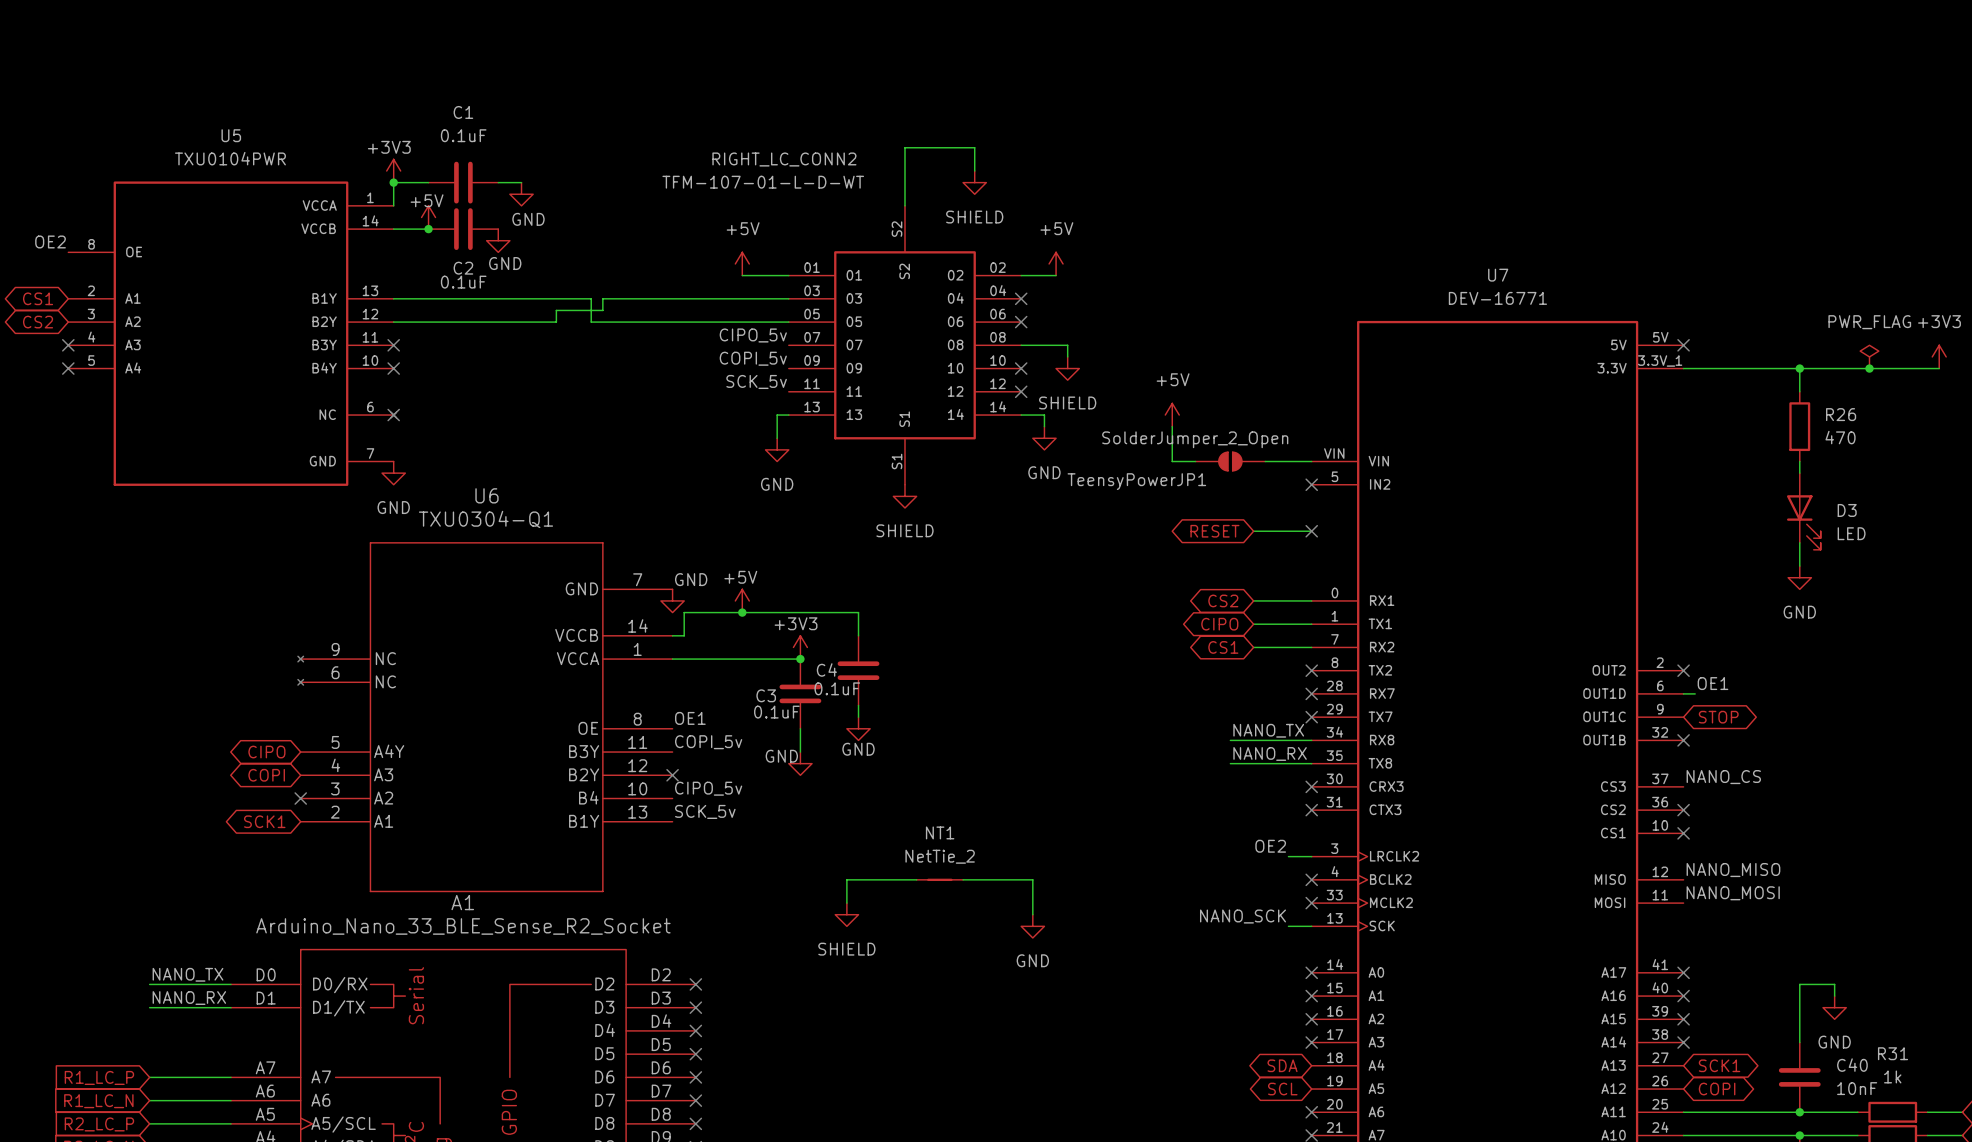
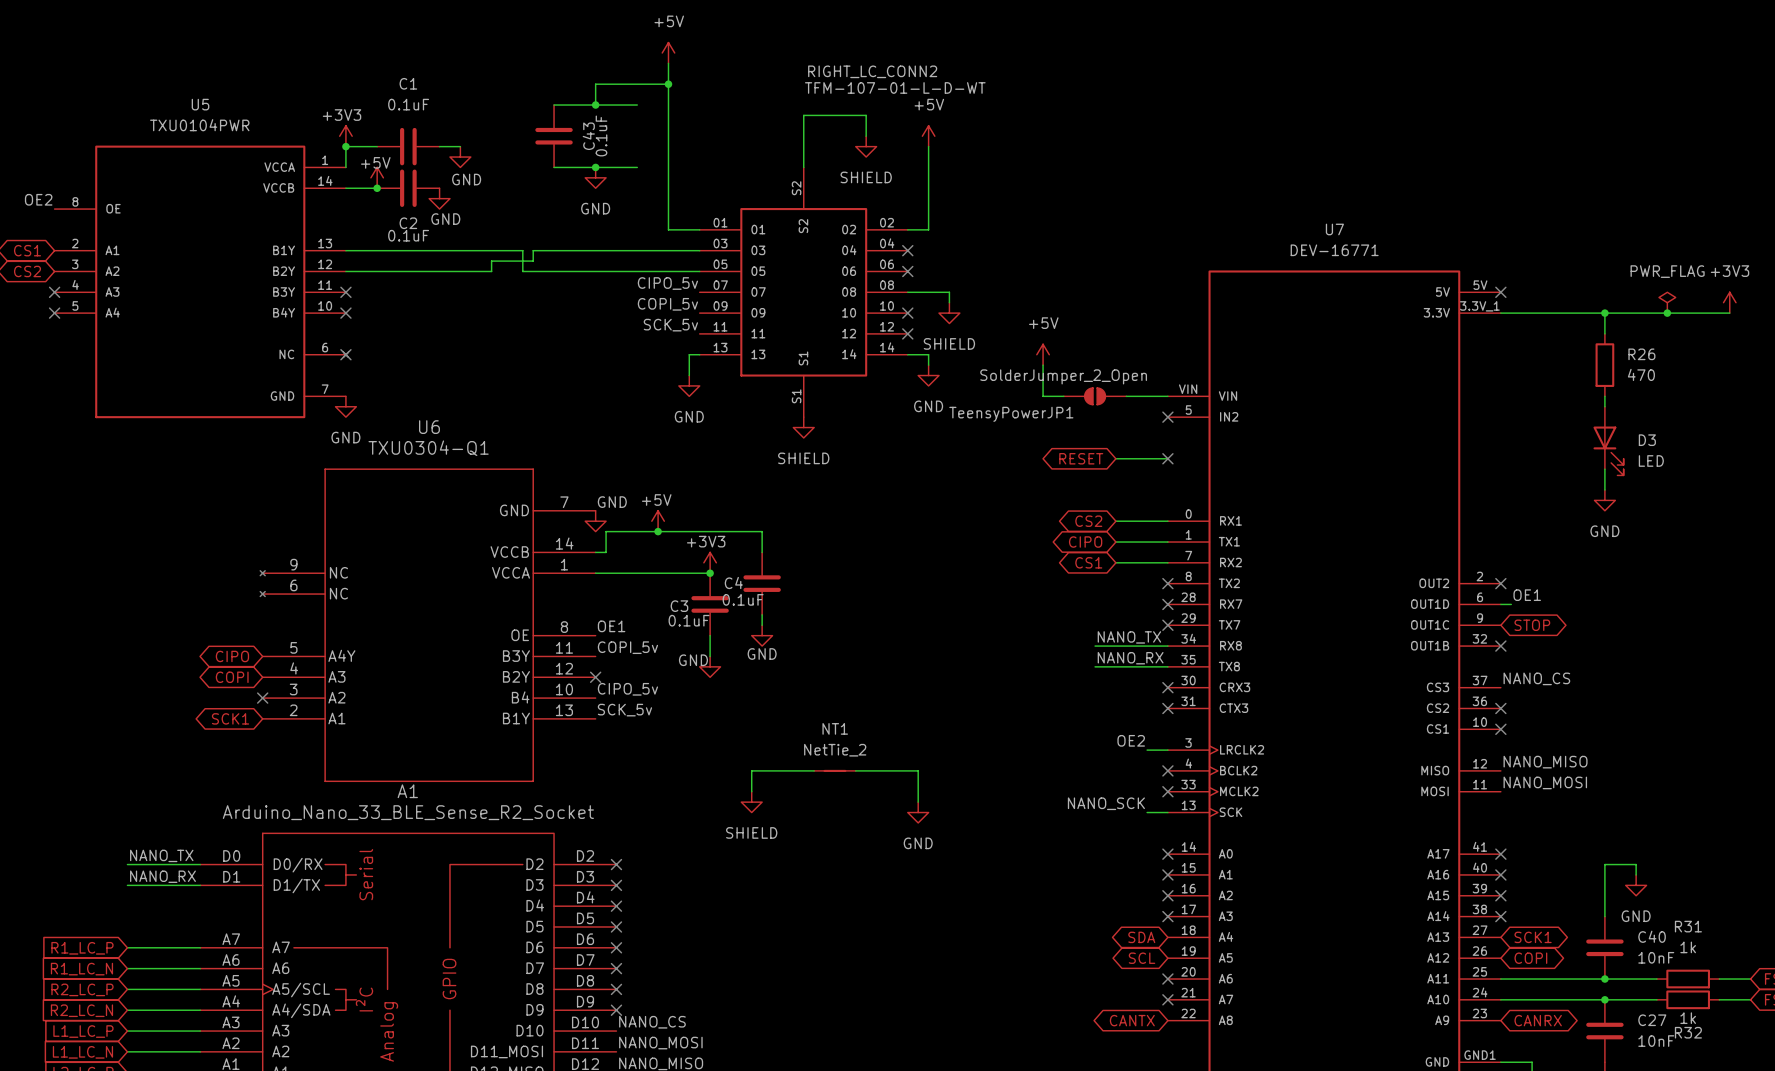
power symbol: none -> +5V (668, 52)
wire: none -> (668, 84) (595, 84) (595, 105)
junction: none -> (668, 84)
wire: none -> (554, 105) (637, 105)
junction: none -> (595, 105)
RIGHT_LC_CONN2 name position: RIGHT_LC_CONN2 (784, 159) -> RIGHT_LC_CONN2 (872, 71)
C43: none -> 0.1uF (554, 136)
RIGHT_LC_CONN2 value position: TFM-107-01-L-D-WT (763, 182) -> TFM-107-01-L-D-WT (895, 87)
wire: none -> (554, 167) (637, 167)
junction: none -> (595, 167)
power symbol: none -> GND (595, 177)
power symbol: +5V (742, 263) -> none
power symbol position: +5V (1056, 263) -> +5V (928, 136)
wire: (742, 275) (753, 275) -> (668, 63) (668, 229)
wire: (1044, 275) (1056, 275) -> (928, 229) (928, 146)

